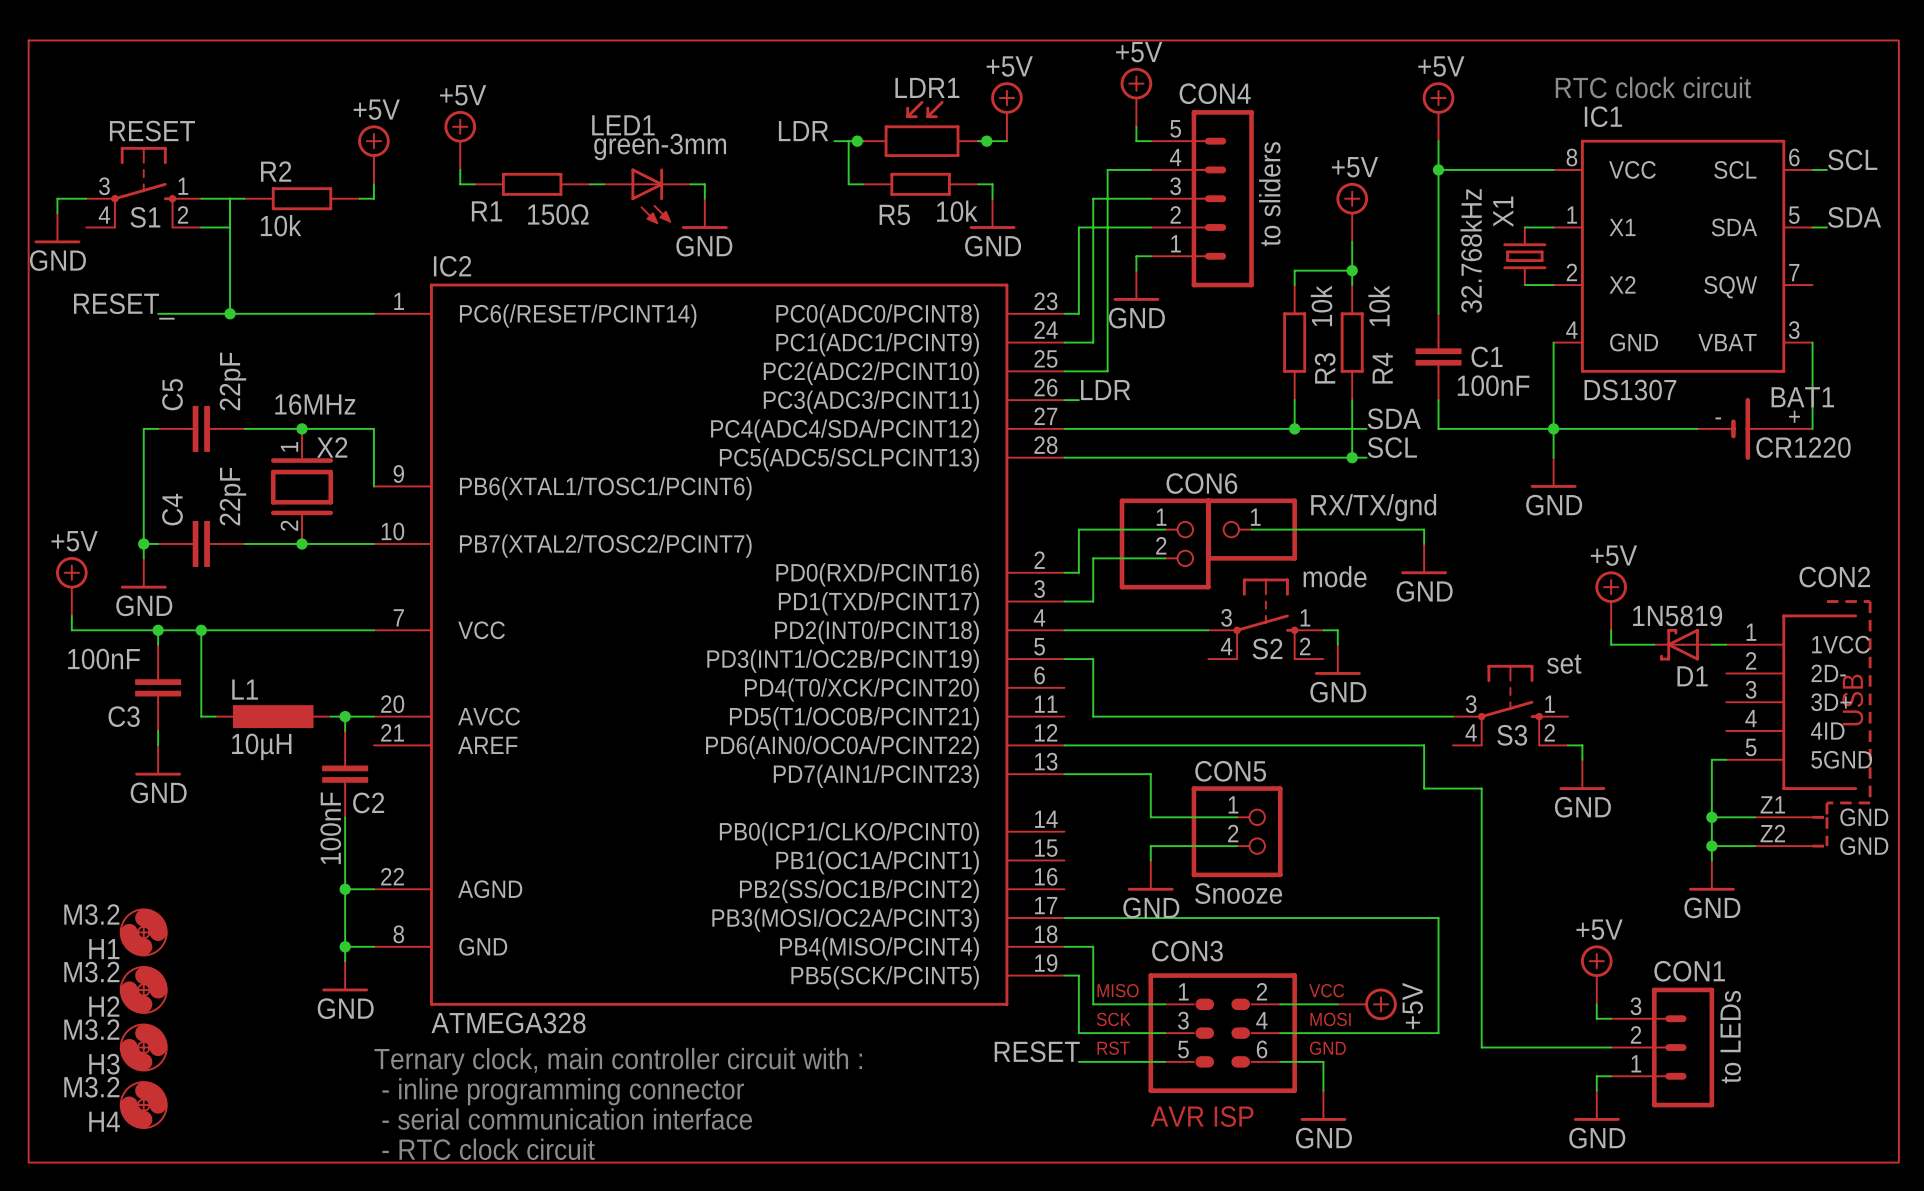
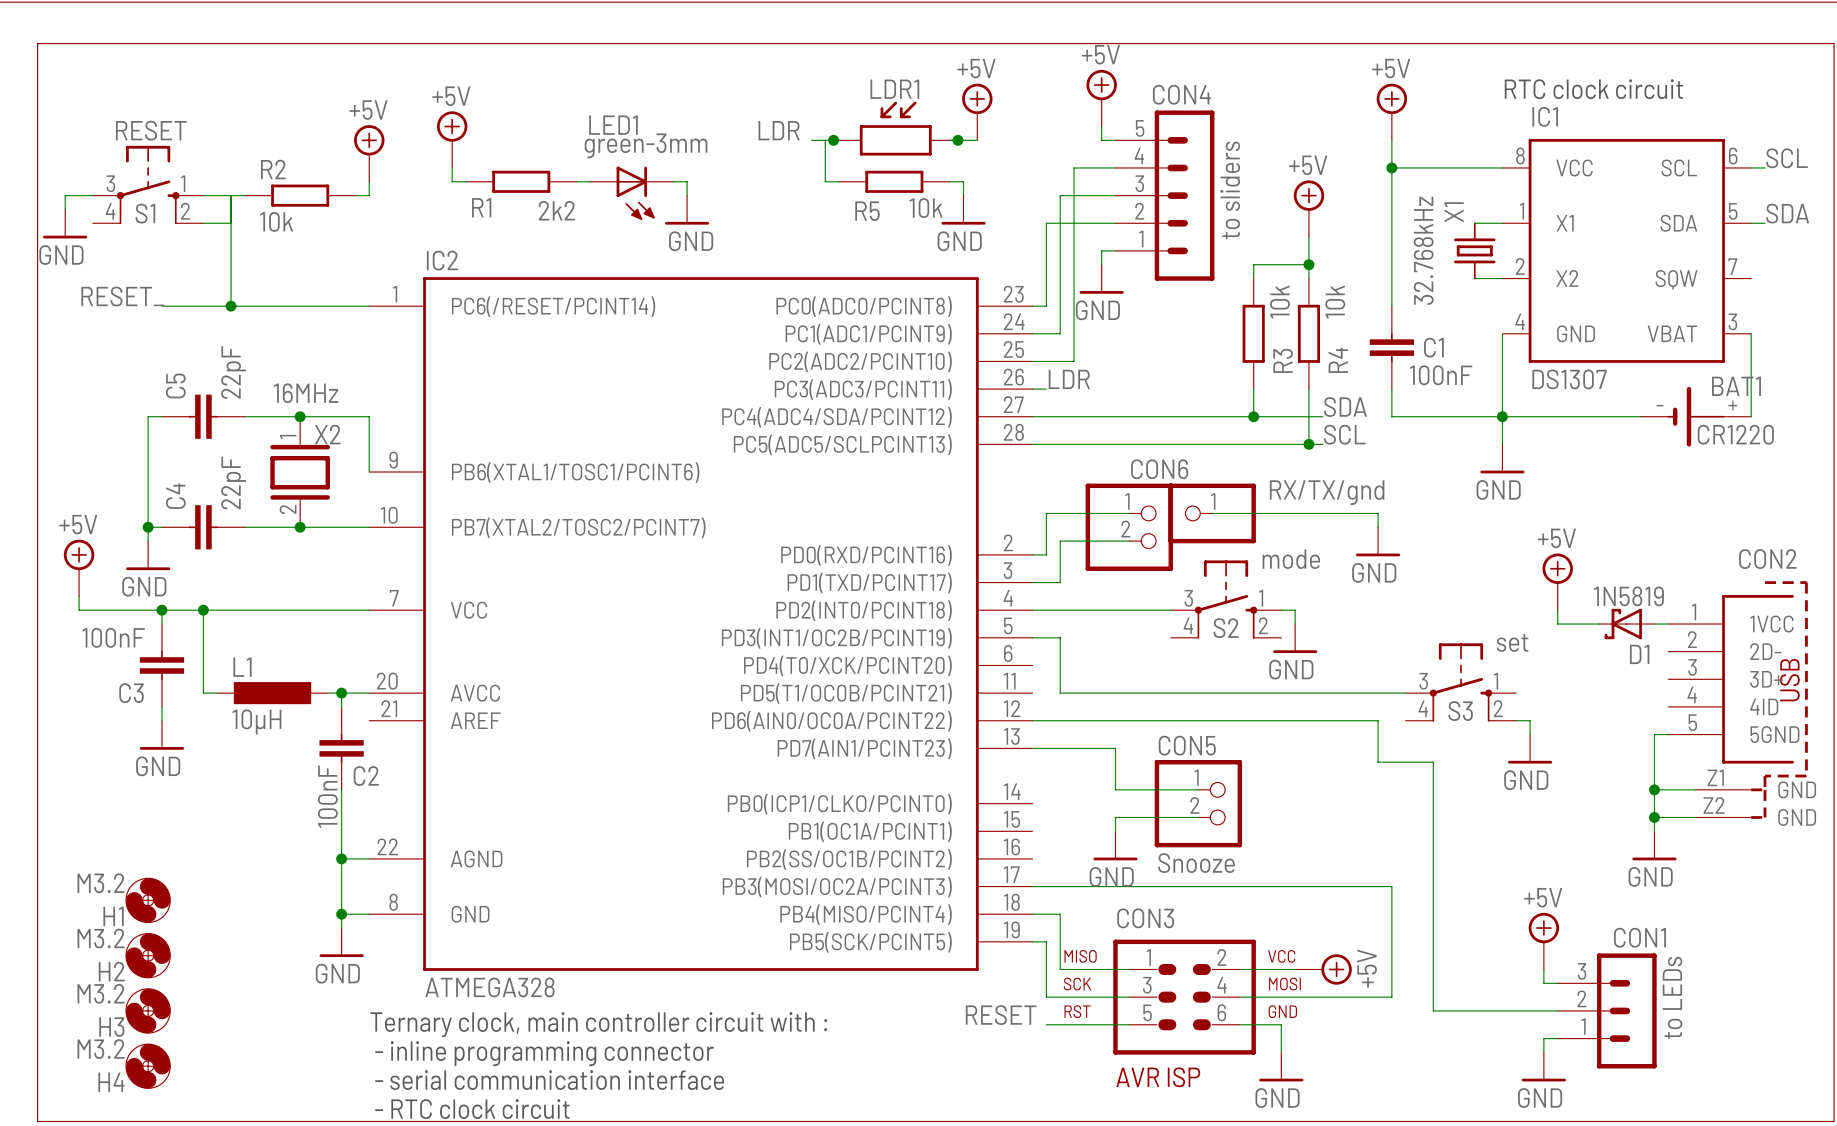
R1 value: 150Ω (558, 214) -> 2k2 (556, 210)

